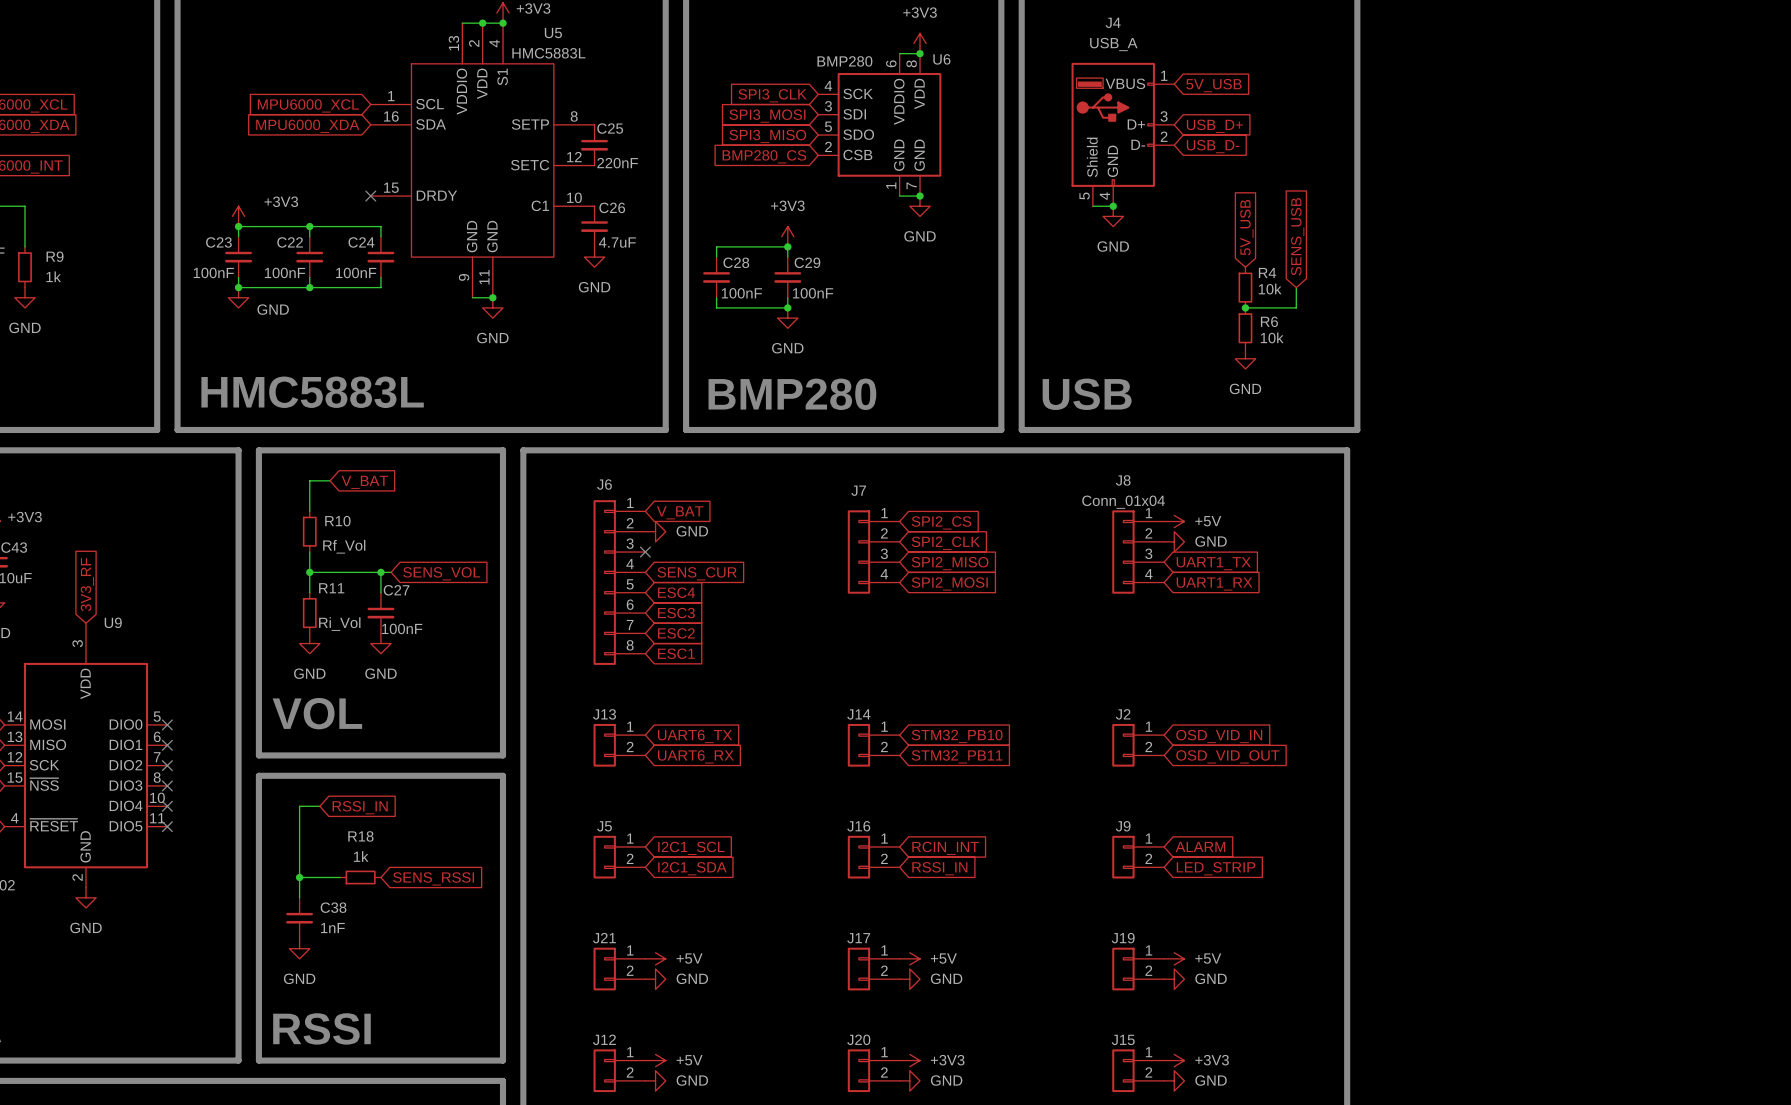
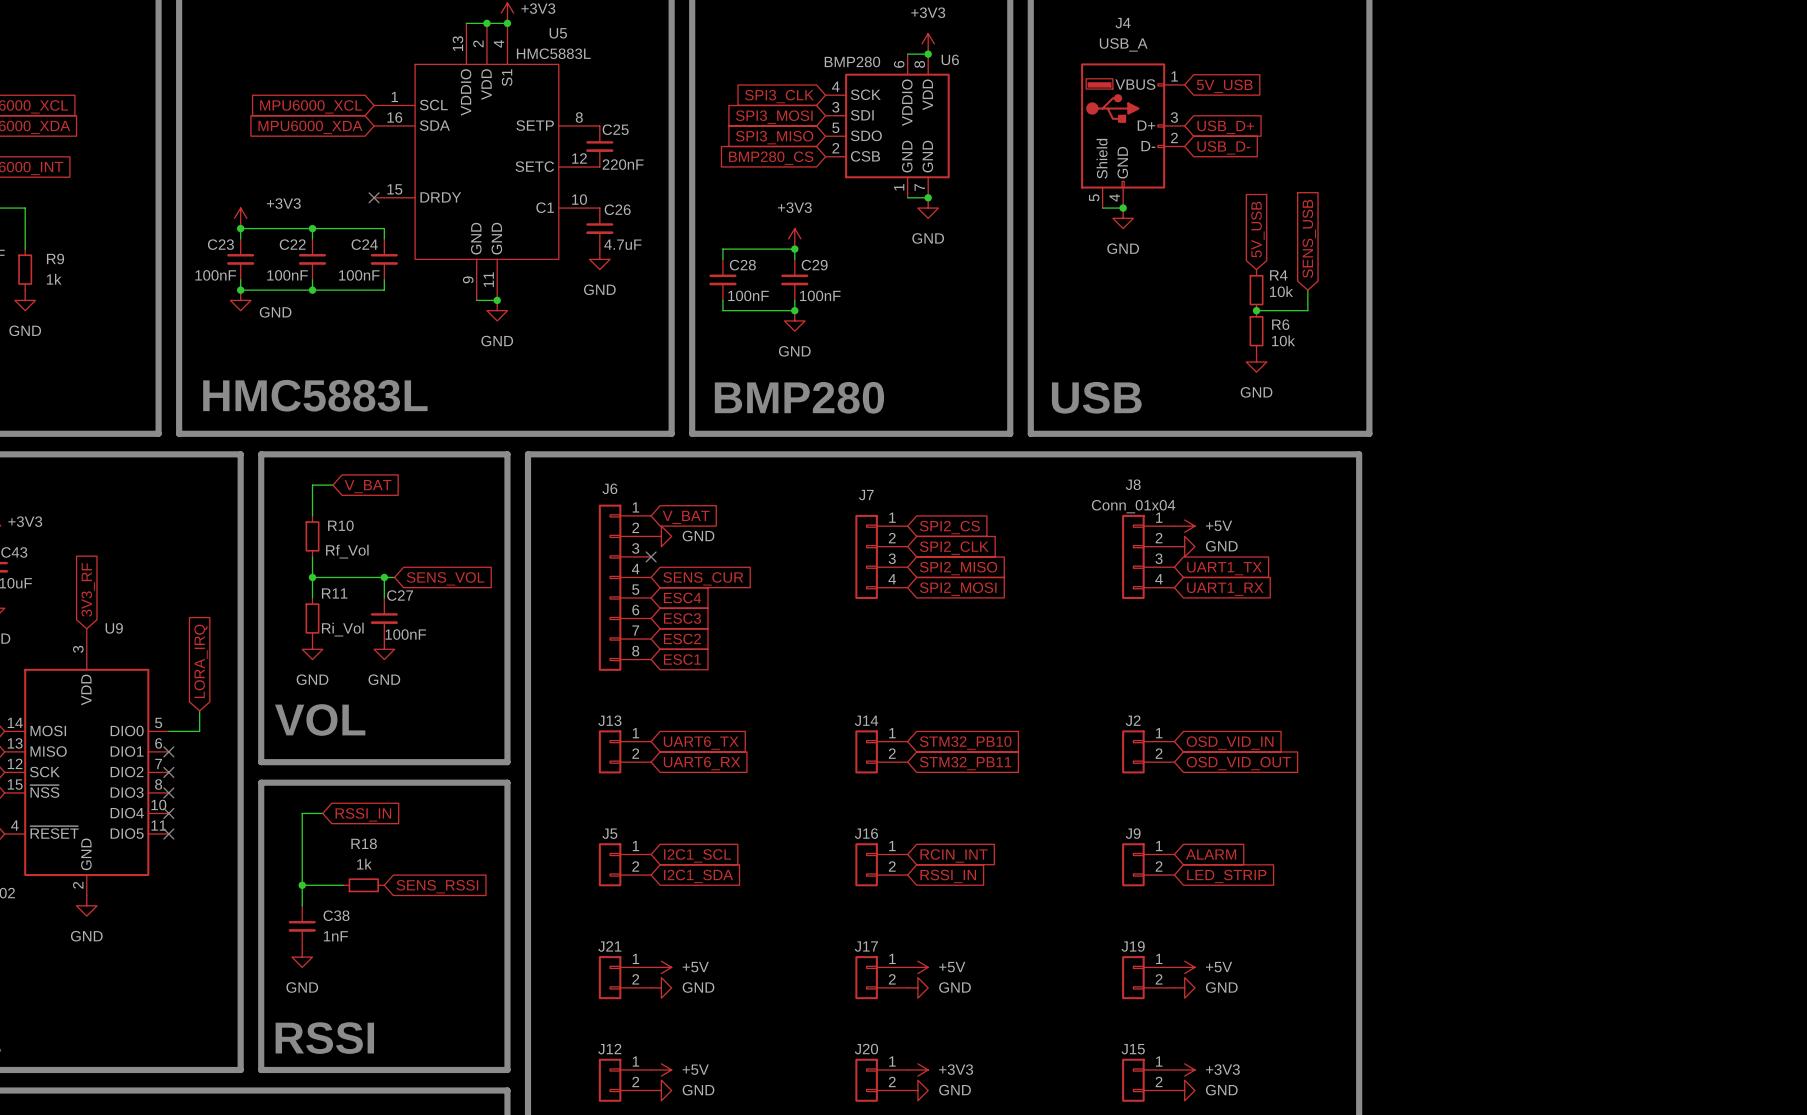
global label: none -> LORA_IRQ (201, 661)
wire: none -> (199, 710) (199, 731) (168, 731)
no-connect mark: (167, 724) -> none

